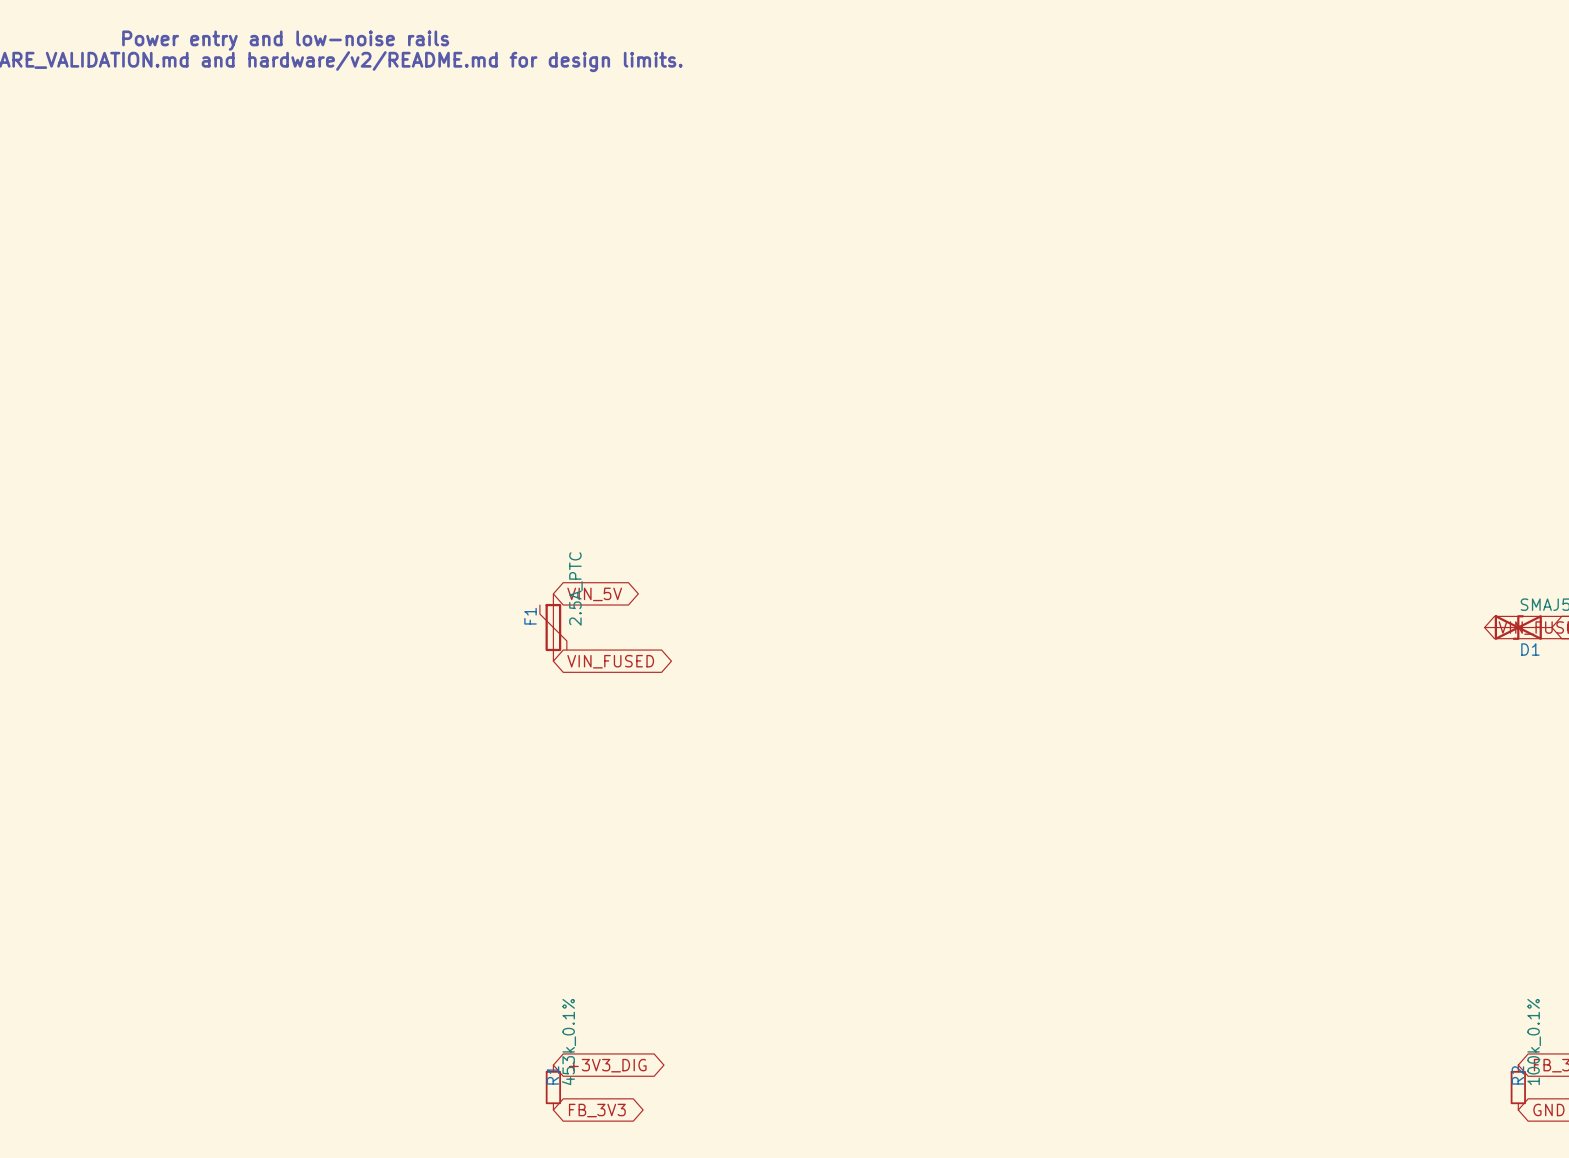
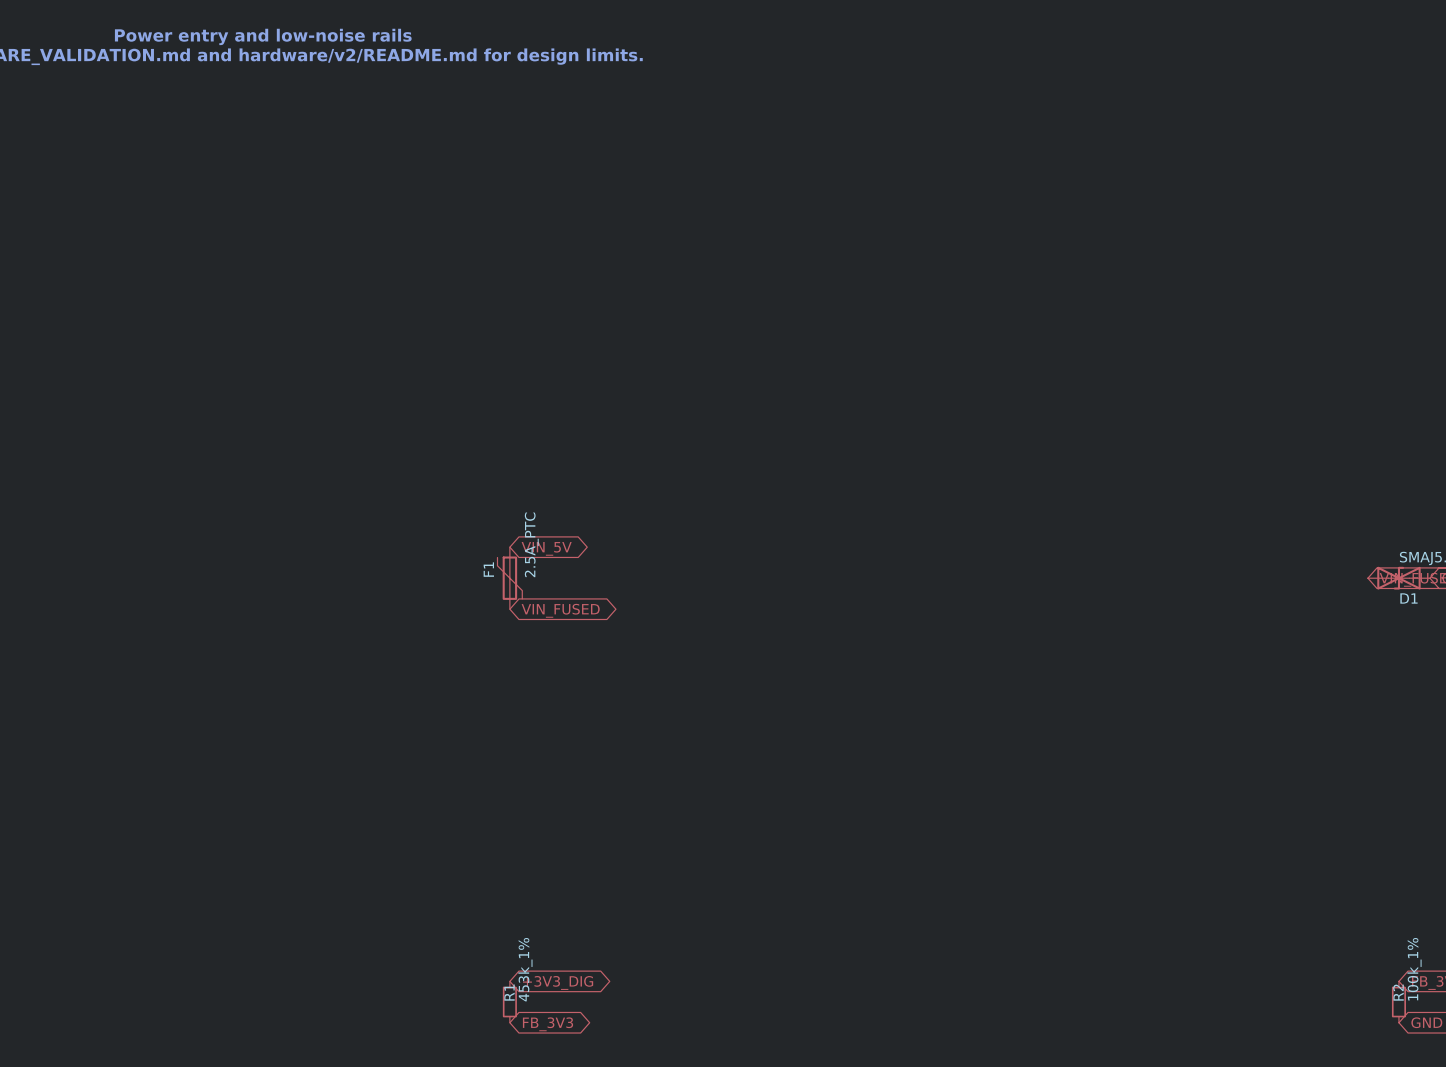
R1 value: 453k_0.1% (568, 1042) -> 453k_1% (525, 969)
R2 value: 100k_0.1% (1534, 1042) -> 100k_1% (1414, 969)

